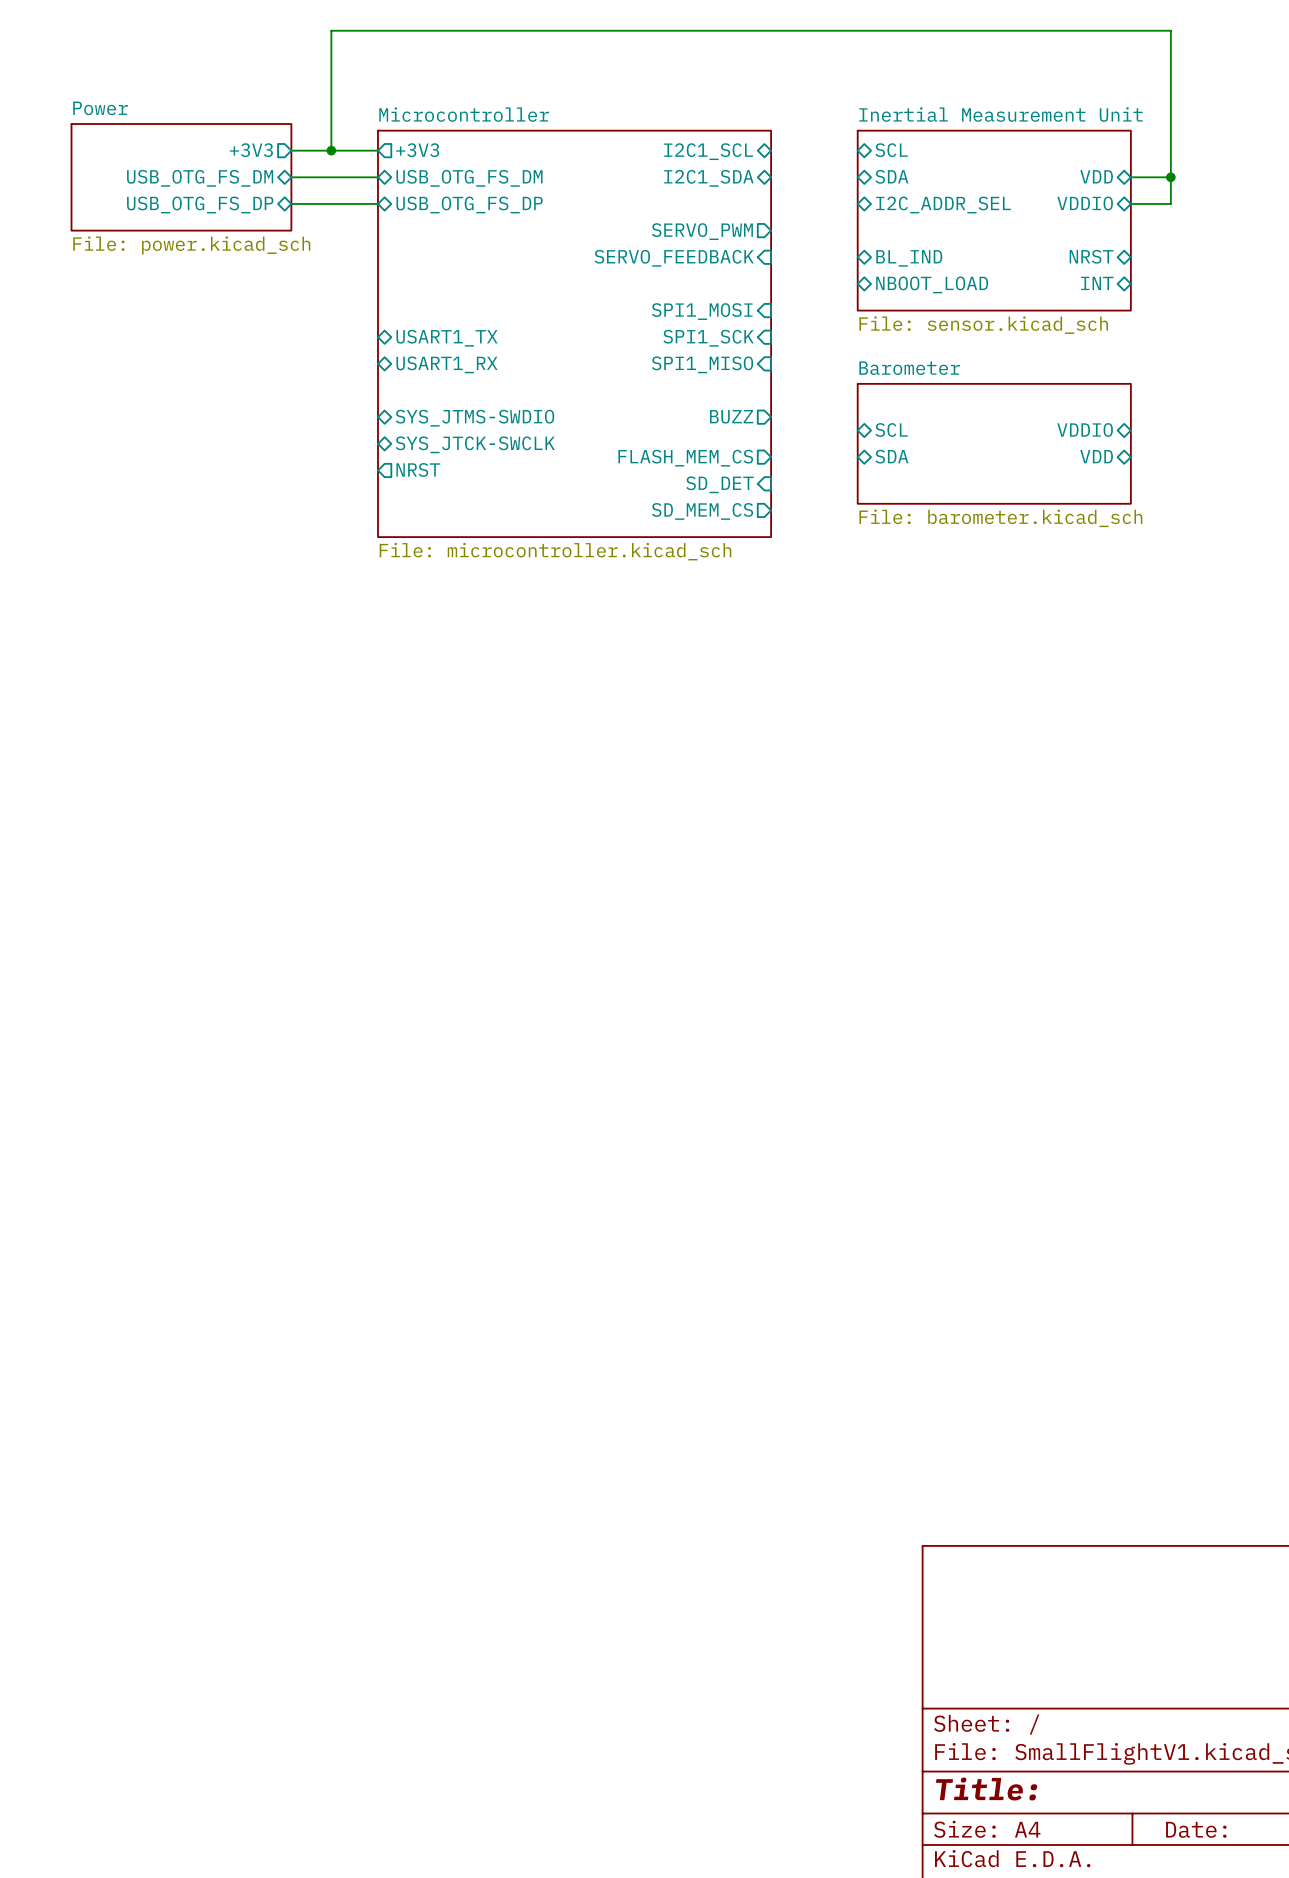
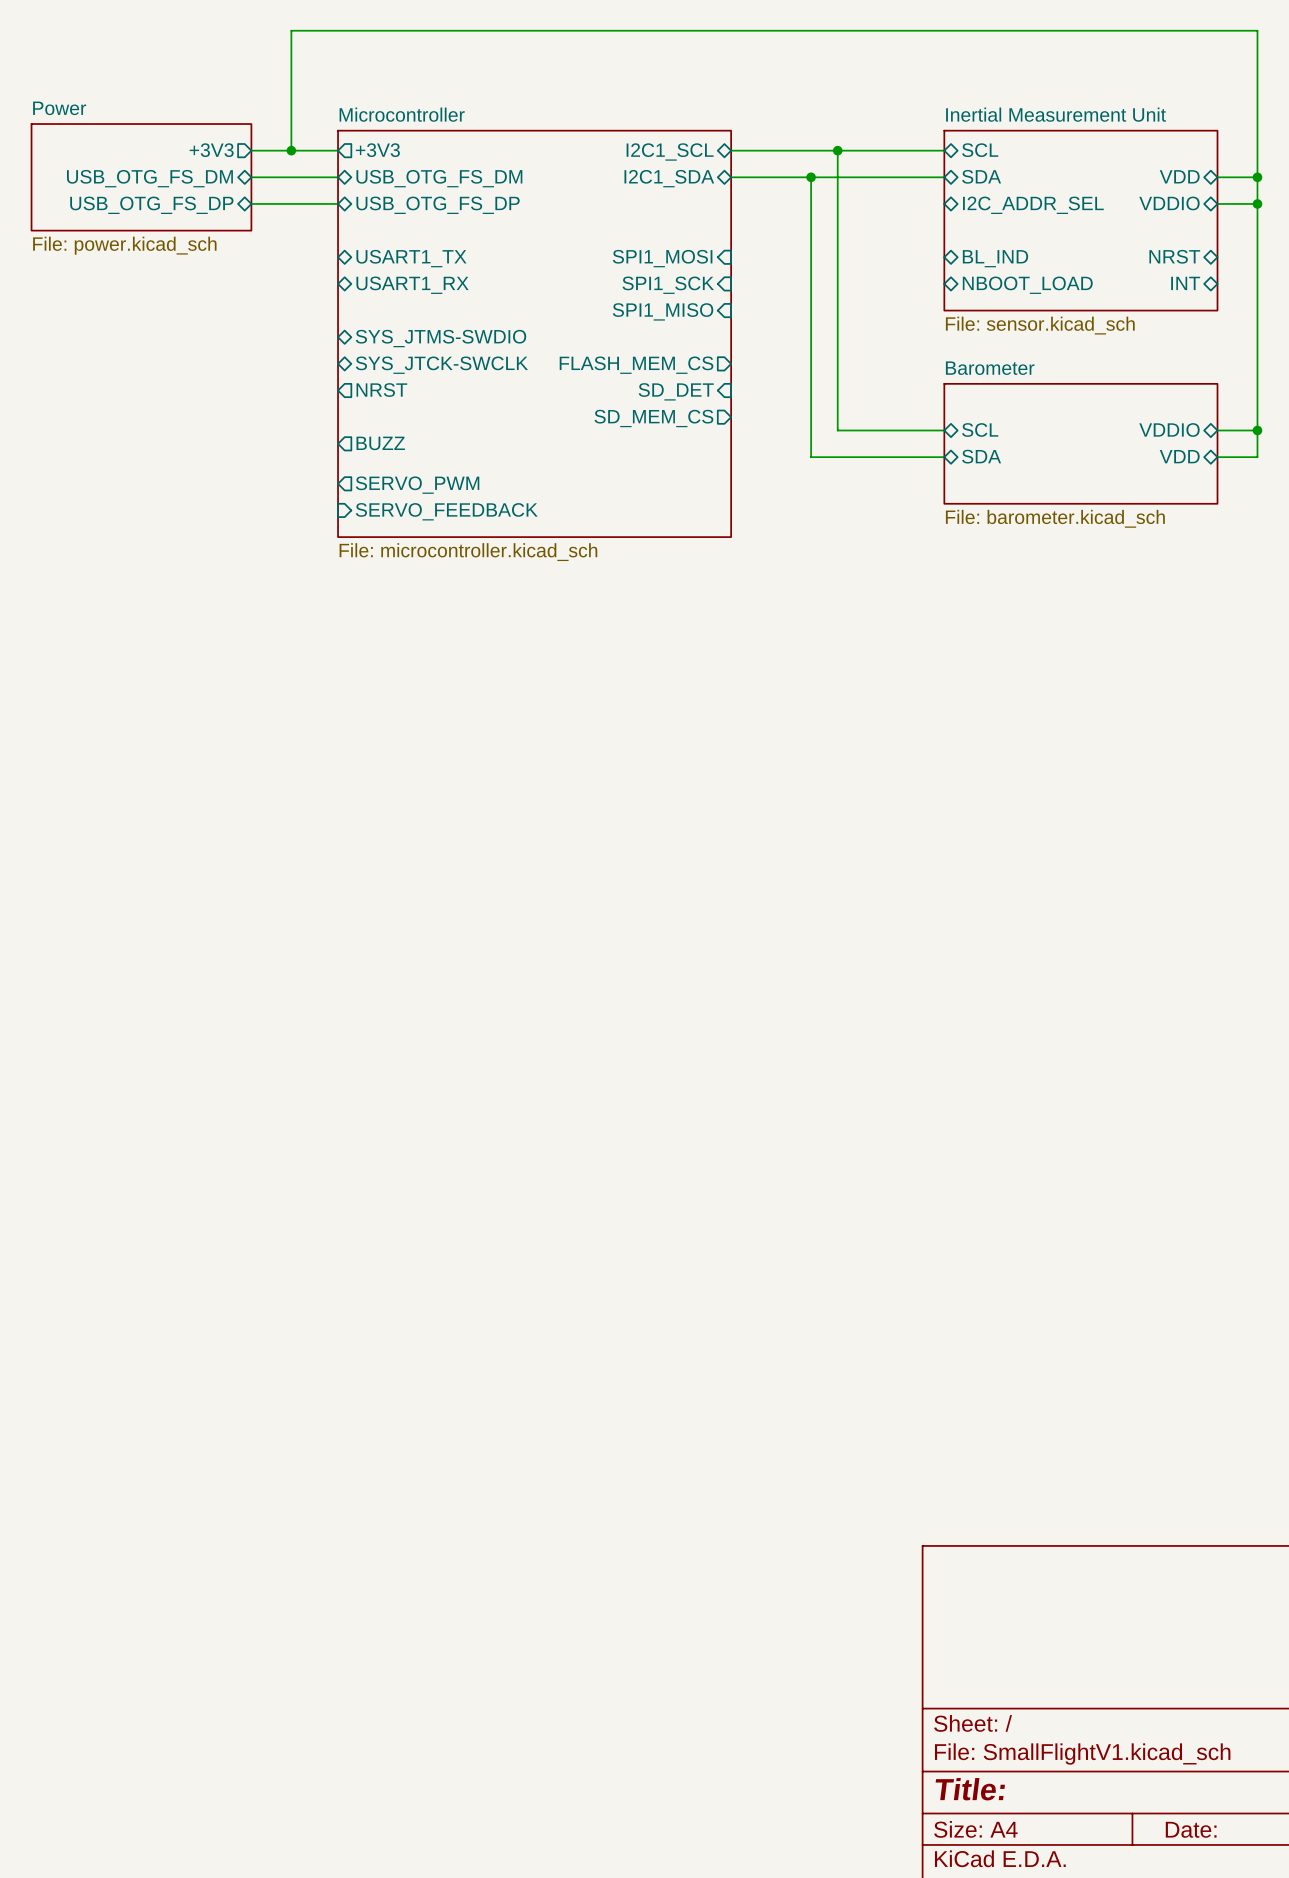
wire: (331, 30) (331, 150) -> (331, 30) (291, 30) (291, 150) (251, 150)
wire: (1170, 30) (1170, 203) (1130, 203) -> (1170, 30) (1257, 30) (1257, 457) (1217, 457)
sheet pin position: +3V3 (251, 150) -> +3V3 (211, 150)
junction position: (331, 150) -> (291, 150)
wire: (338, 150) (377, 150) -> none
sheet pin position: +3V3 (417, 150) -> +3V3 (377, 150)
wire: none -> (731, 150) (944, 150)
wire: none -> (837, 150) (837, 430) (944, 430)
junction: none -> (837, 150)
sheet pin position: SCL (891, 150) -> SCL (980, 150)
sheet pin position: I2C1_SCL (708, 151) -> I2C1_SCL (670, 151)
sheet pin position: SDA (891, 176) -> SDA (981, 176)
sheet pin position: VDD (1096, 176) -> VDD (1179, 176)
sheet Power position: (181, 177) -> (141, 177)
wire: (338, 177) (377, 177) -> (251, 177) (291, 177)
wire: none -> (731, 177) (944, 177)
wire: none -> (811, 177) (811, 457) (944, 457)
junction: none -> (811, 177)
wire: (1130, 177) (1170, 177) -> (1217, 177) (1257, 177)
junction: (1170, 177) -> none
junction: none -> (1257, 177)
sheet pin position: USB_OTG_FS_DM (200, 178) -> USB_OTG_FS_DM (149, 178)
sheet pin position: USB_OTG_FS_DM (469, 178) -> USB_OTG_FS_DM (439, 178)
sheet pin position: I2C1_SDA (708, 178) -> I2C1_SDA (669, 178)
wire: (338, 203) (377, 203) -> (251, 203) (291, 203)
sheet pin position: VDDIO (1085, 203) -> VDDIO (1169, 203)
wire: none -> (1217, 203) (1257, 203)
junction: none -> (1257, 203)
sheet pin position: USB_OTG_FS_DP (200, 204) -> USB_OTG_FS_DP (151, 205)
sheet pin position: USB_OTG_FS_DP (469, 204) -> USB_OTG_FS_DP (438, 205)
sheet pin position: I2C_ADDR_SEL (943, 204) -> I2C_ADDR_SEL (1033, 205)
sheet Inertial Measurement Unit position: (994, 220) -> (1080, 220)
sheet pin: SERVO_PWM (702, 231) -> none
sheet pin position: NRST (1091, 256) -> NRST (1174, 256)
sheet pin: SERVO_FEEDBACK (674, 258) -> none
sheet pin position: BL_IND (909, 258) -> BL_IND (995, 258)
sheet pin position: INT (1097, 283) -> INT (1185, 283)
sheet pin position: NBOOT_LOAD (932, 284) -> NBOOT_LOAD (1027, 285)
sheet pin position: SPI1_MOSI (702, 311) -> SPI1_MOSI (662, 258)
sheet Microcontroller position: (574, 333) -> (534, 333)
sheet pin position: USART1_TX (446, 338) -> USART1_TX (411, 258)
sheet pin position: SPI1_SCK (708, 338) -> SPI1_SCK (668, 285)
sheet pin position: USART1_RX (446, 364) -> USART1_RX (412, 285)
sheet pin position: SPI1_MISO (702, 364) -> SPI1_MISO (663, 311)
sheet pin: BUZZ (731, 416) -> none
sheet pin position: SYS_JTMS-SWDIO (475, 418) -> SYS_JTMS-SWDIO (441, 338)
sheet pin position: SCL (891, 430) -> SCL (980, 429)
sheet pin position: VDDIO (1085, 430) -> VDDIO (1169, 429)
wire: none -> (1217, 430) (1257, 430)
junction: none -> (1257, 430)
sheet pin: none -> BUZZ (380, 443)
sheet Barometer position: (994, 443) -> (1080, 443)
sheet pin position: SYS_JTCK-SWCLK (475, 444) -> SYS_JTCK-SWCLK (441, 365)
sheet pin position: SDA (891, 456) -> SDA (981, 456)
sheet pin position: VDD (1096, 456) -> VDD (1179, 456)
sheet pin position: FLASH_MEM_CS (685, 458) -> FLASH_MEM_CS (636, 365)
sheet pin position: NRST (418, 469) -> NRST (381, 390)
sheet pin: none -> SERVO_PWM (417, 485)
sheet pin position: SD_DET (720, 484) -> SD_DET (676, 391)
sheet pin: none -> SERVO_FEEDBACK (446, 511)
sheet pin position: SD_MEM_CS (702, 511) -> SD_MEM_CS (653, 418)

